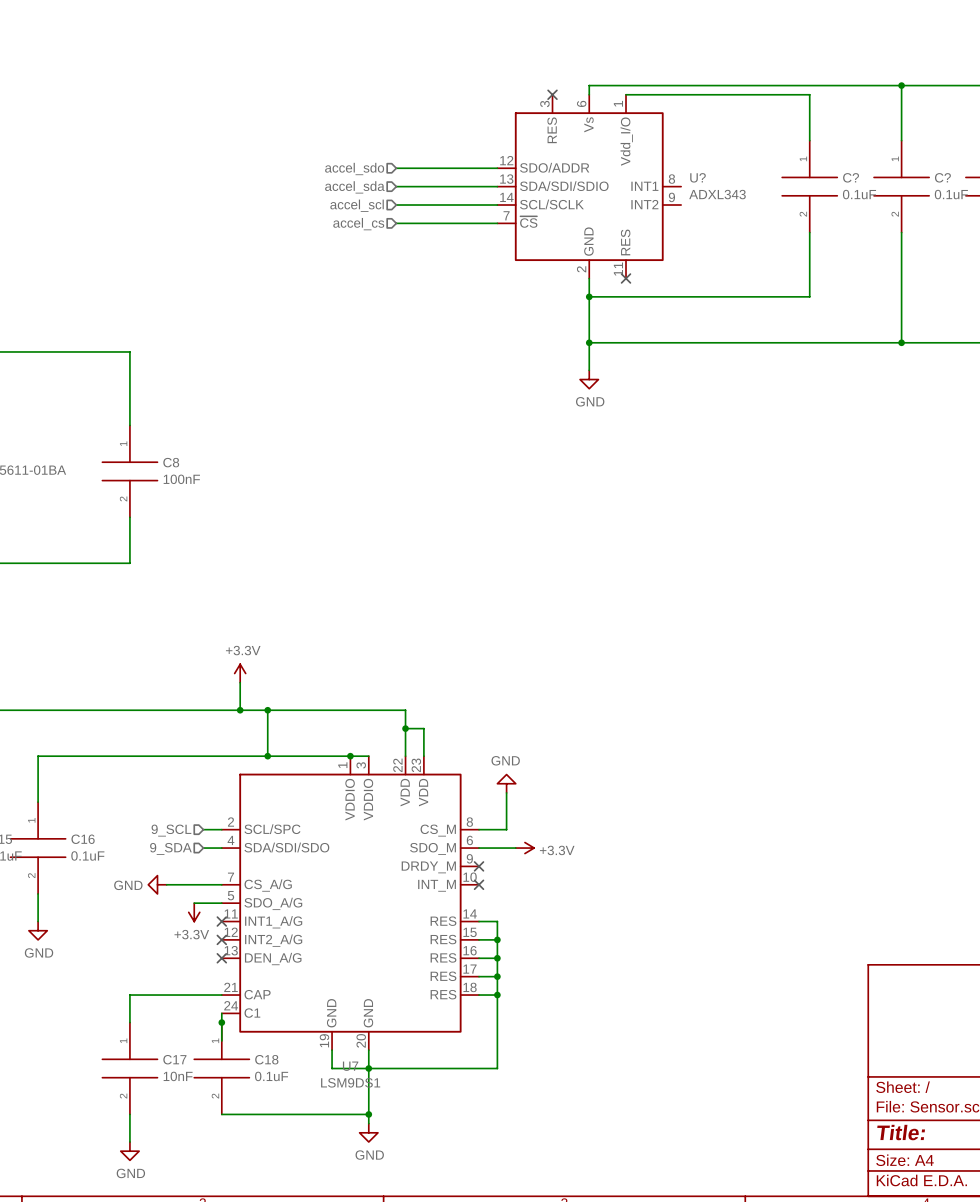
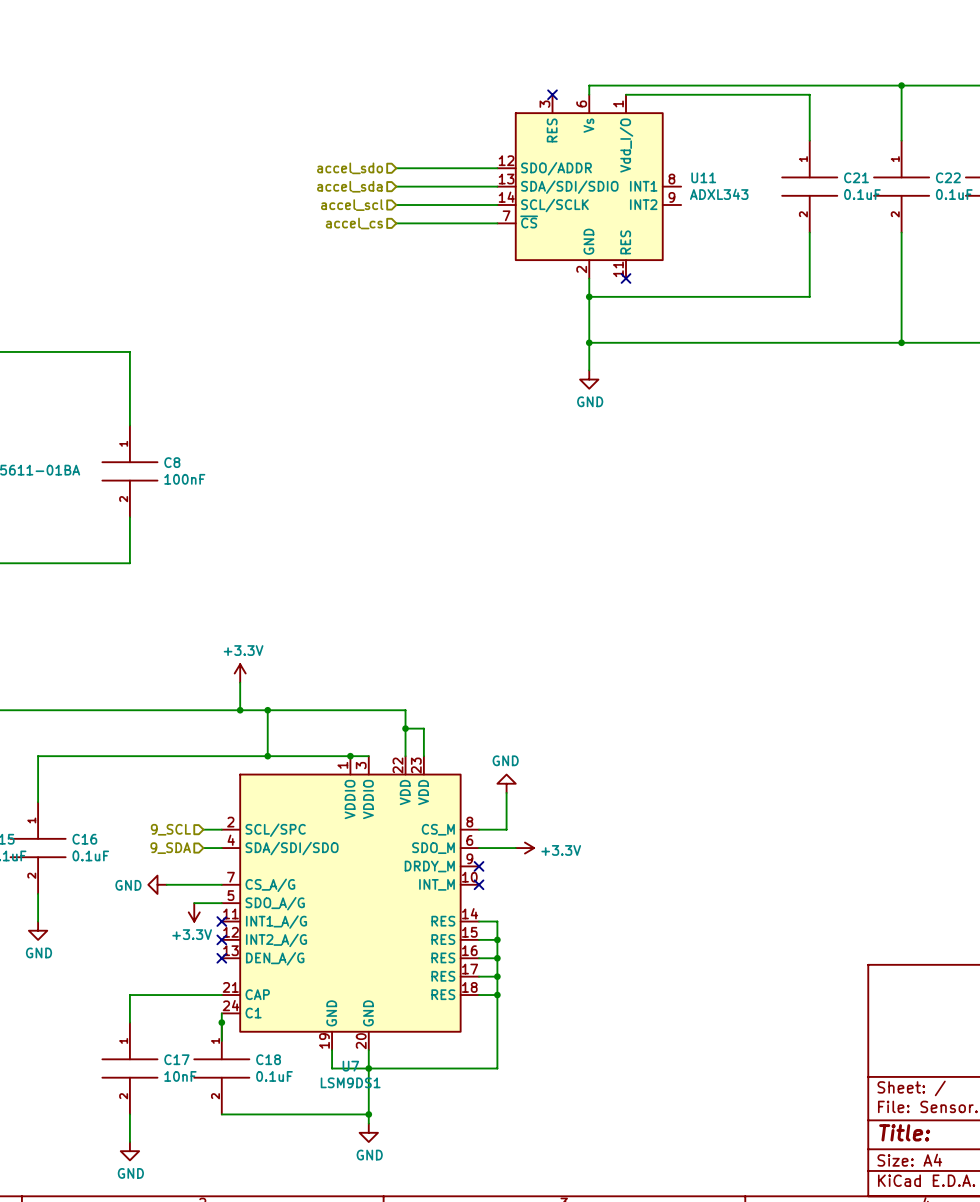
U? name: U? (698, 177) -> U11 (703, 177)
C? name: C? (851, 177) -> C21 (856, 177)
C? name: C? (942, 177) -> C22 (948, 177)

